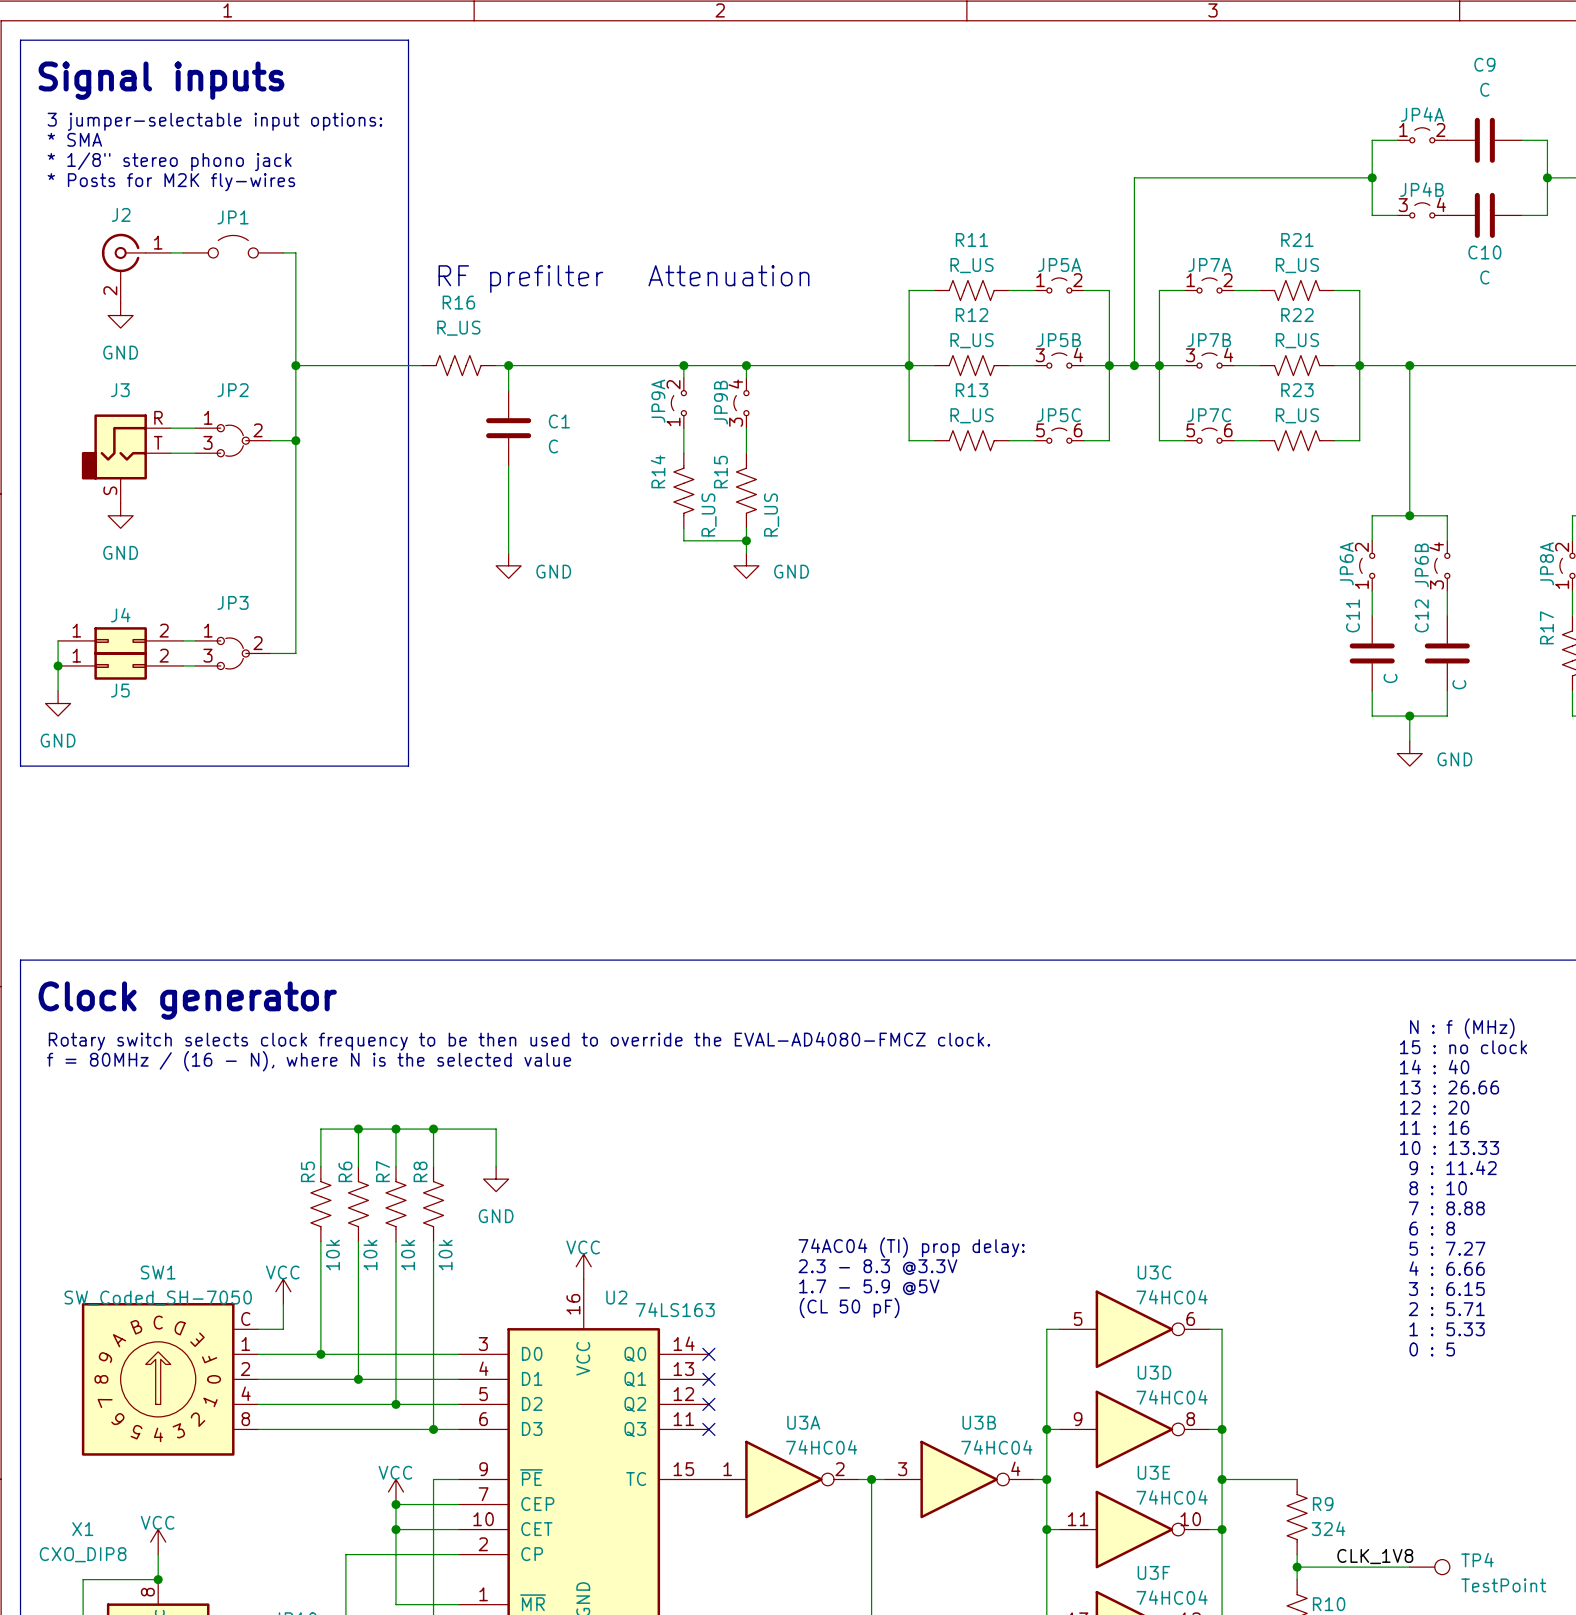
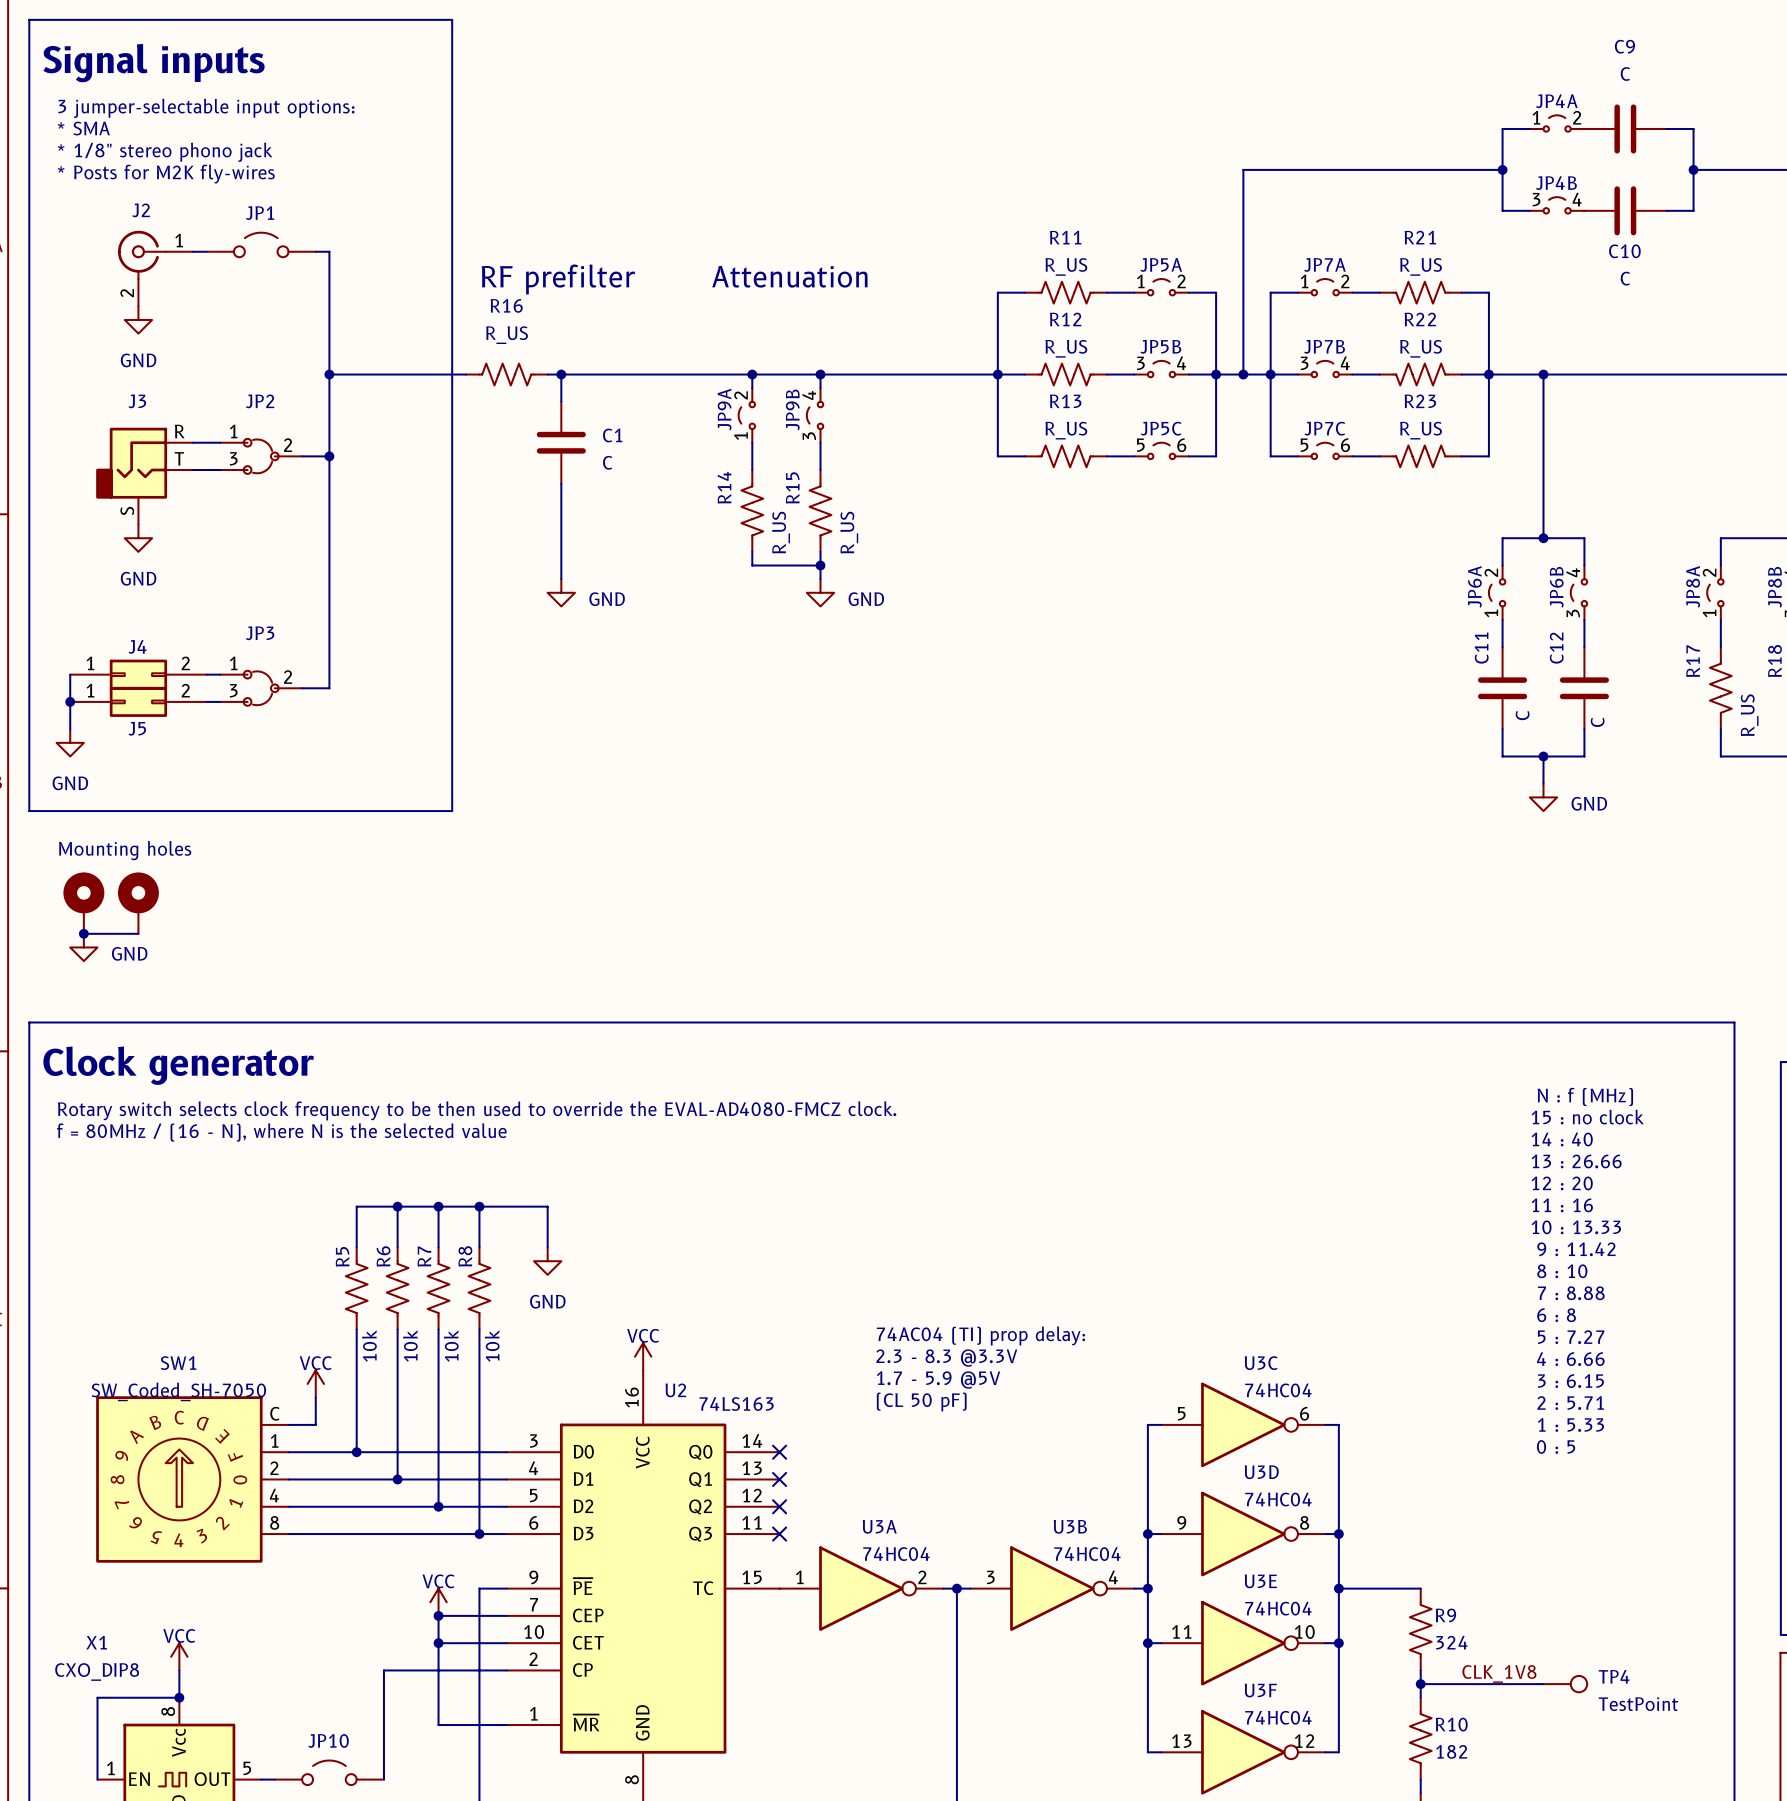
text: none -> Mounting holes (125, 850)
part: none -> (83, 903)
part: none -> (138, 903)
wire: none -> (83, 933) (138, 933)
junction: none -> (83, 933)
power symbol: none -> GND (83, 947)

